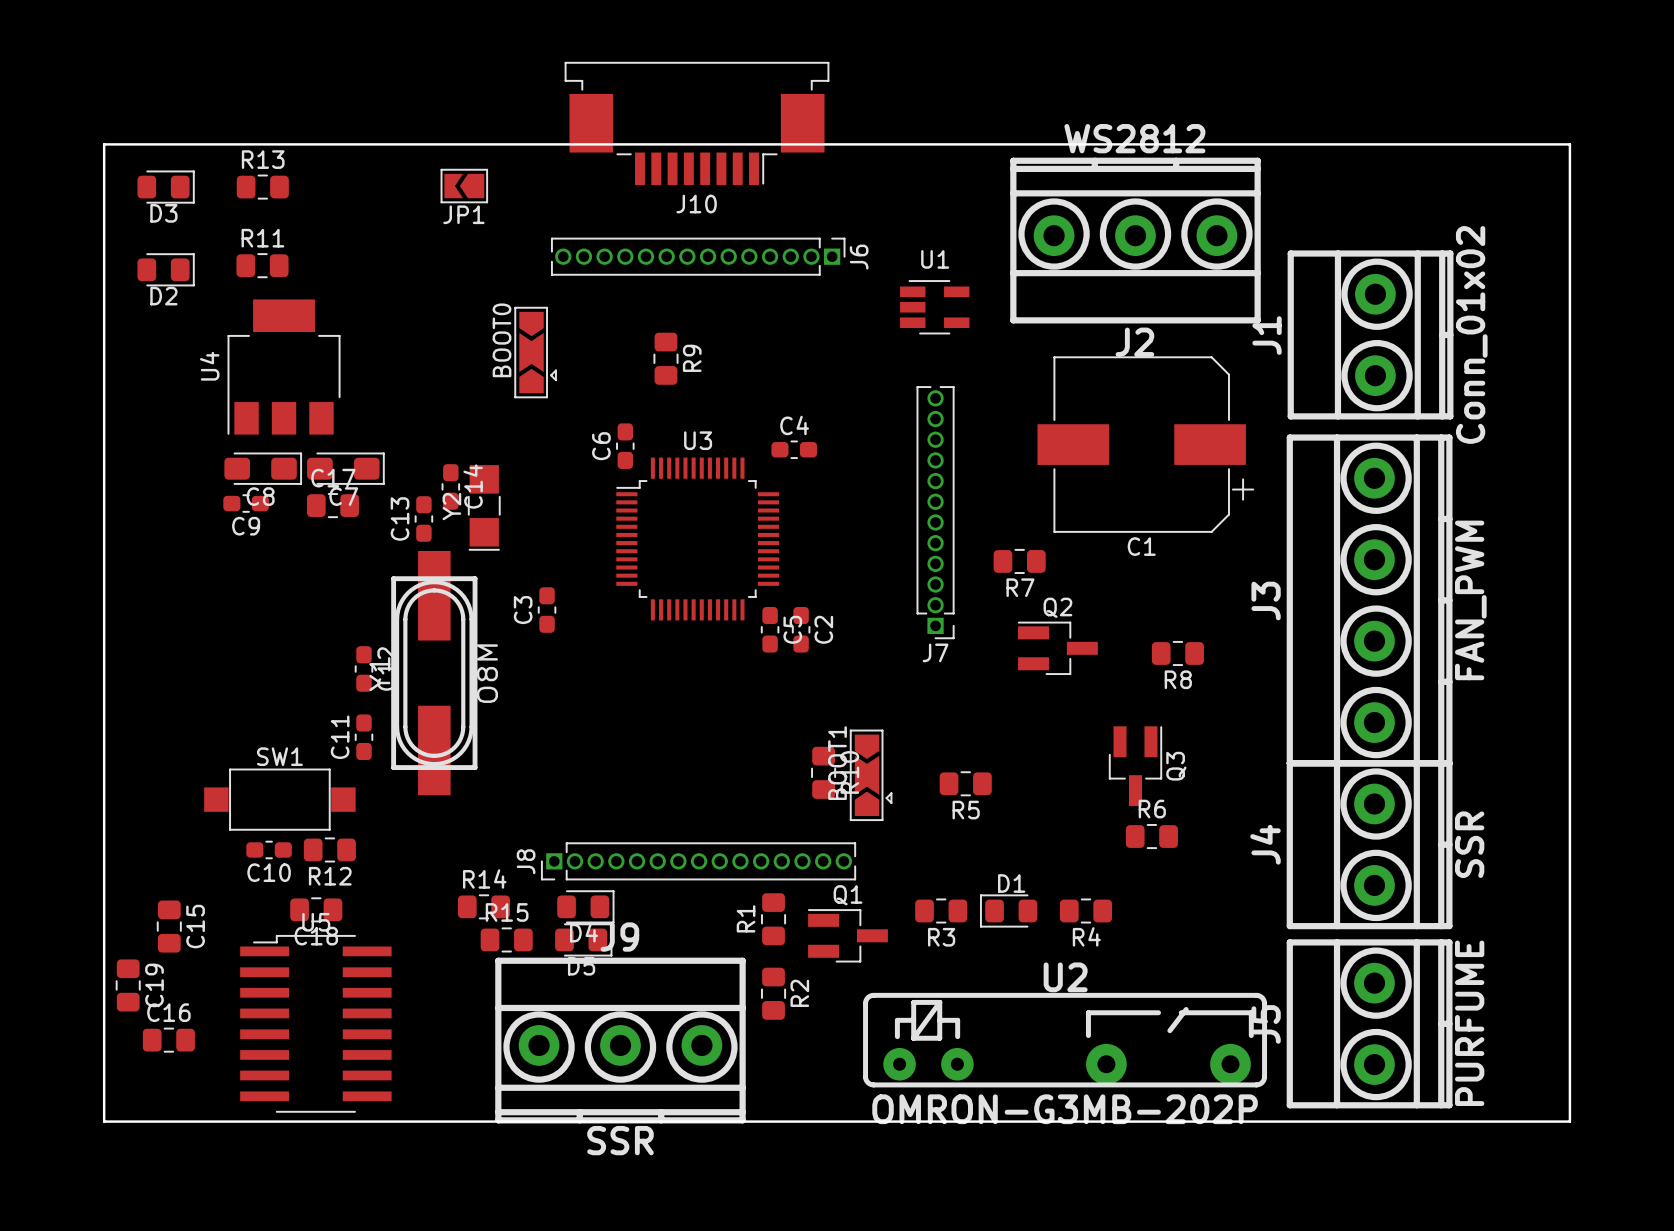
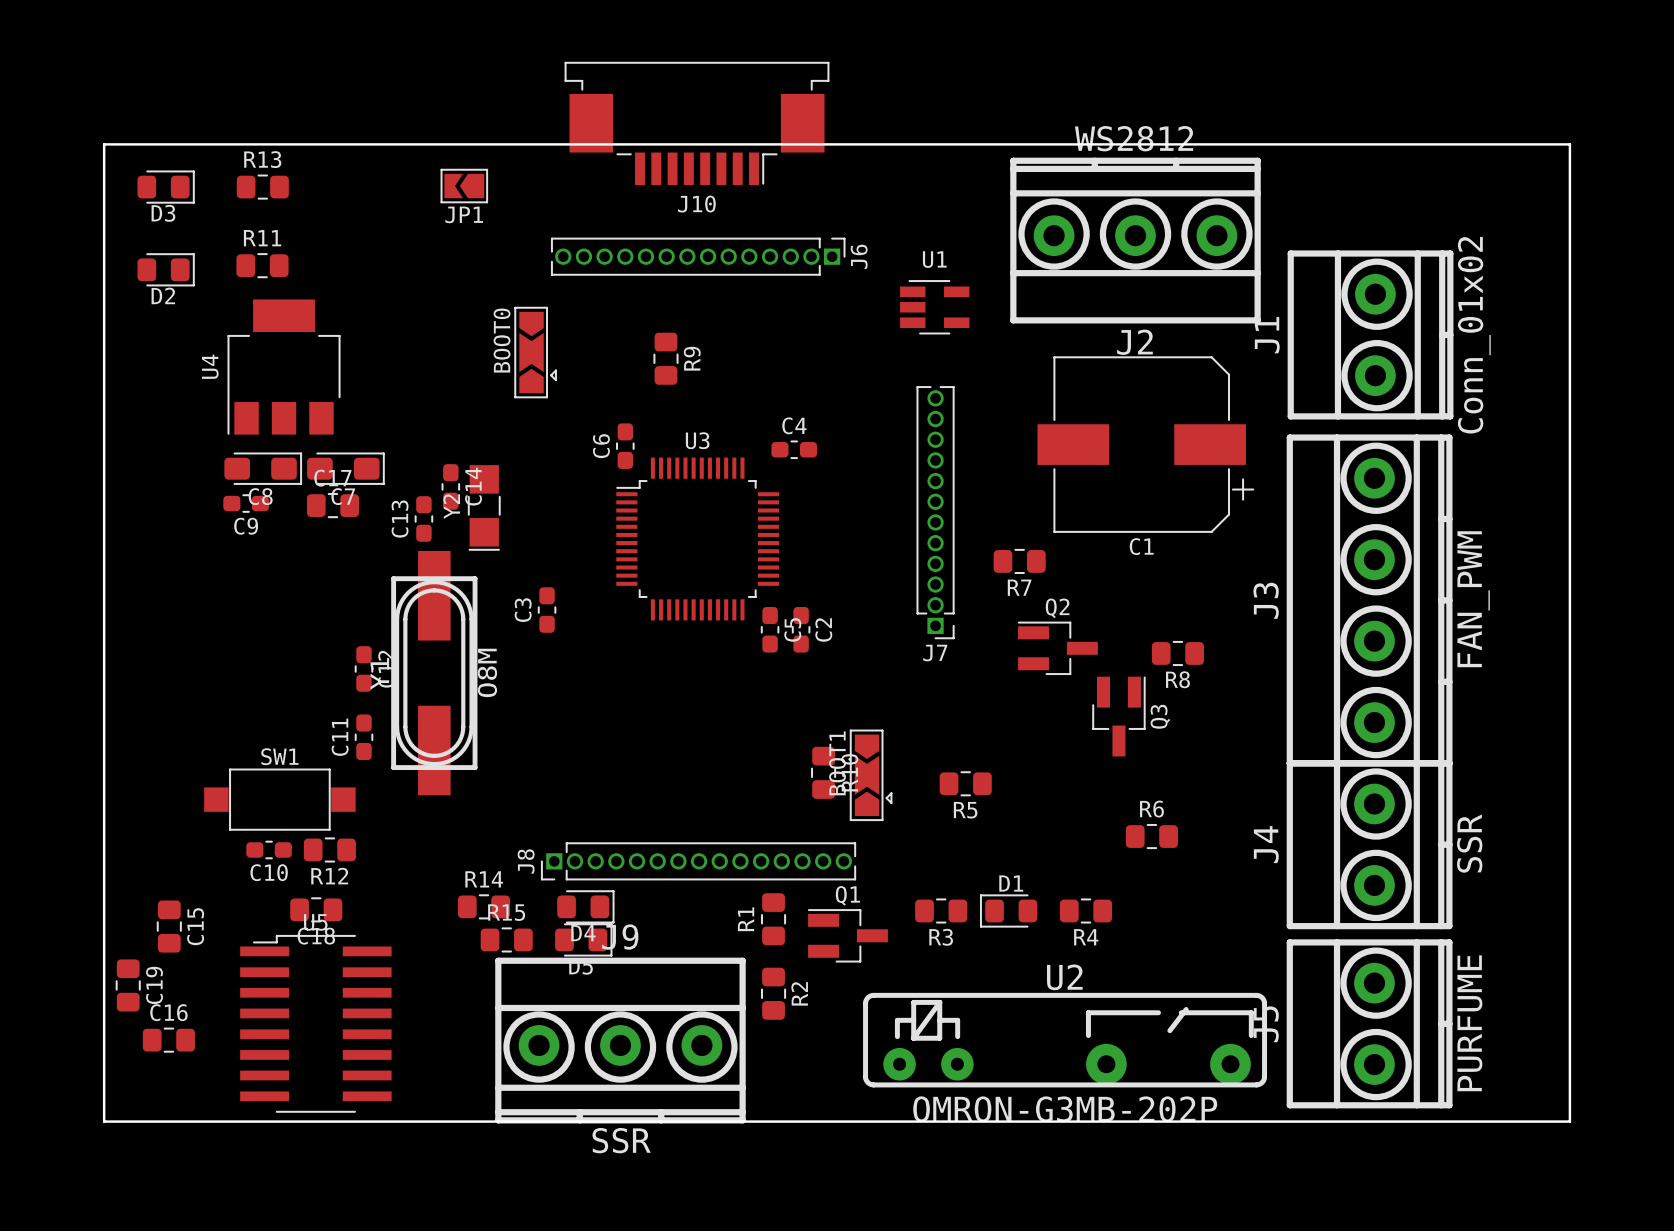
Q3 position: (1135, 766) -> (1118, 716)

